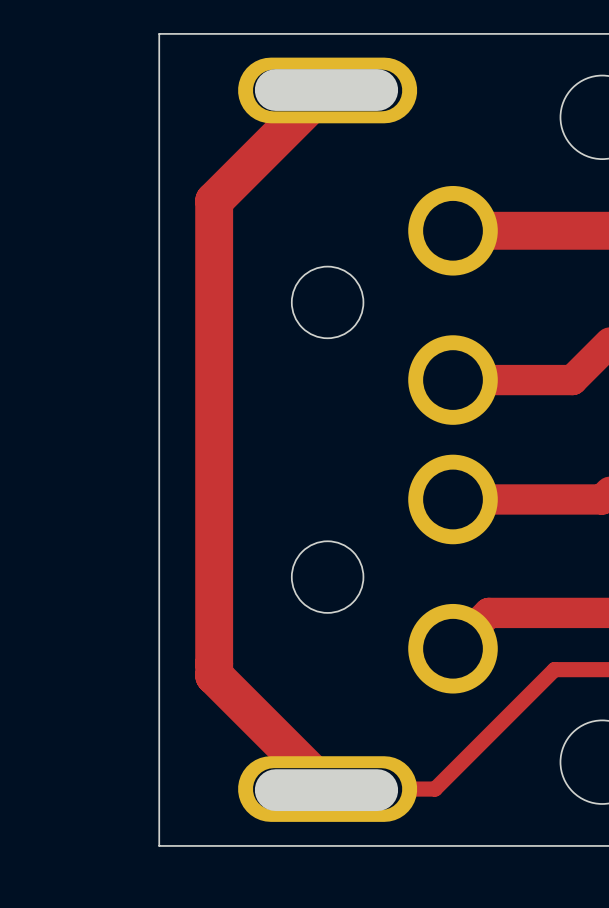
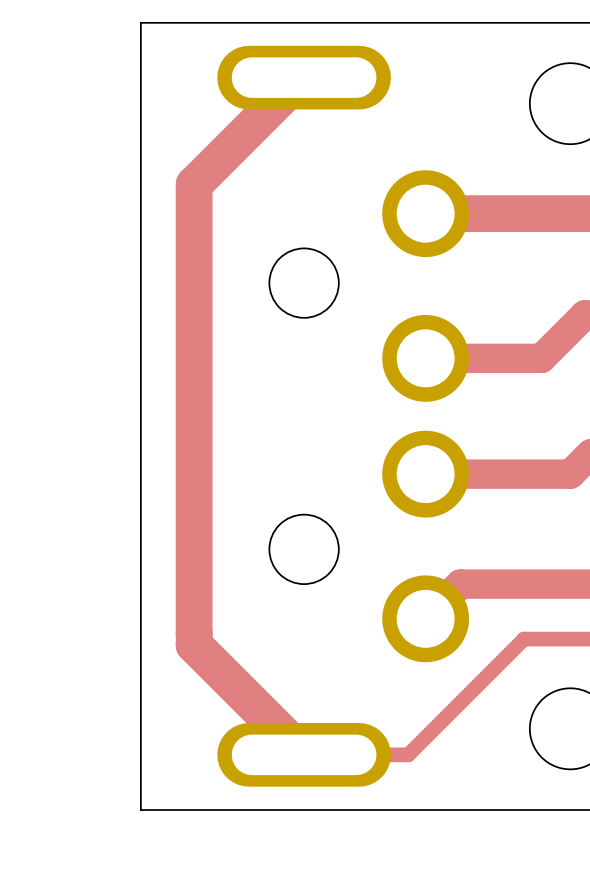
board edge: (275, 90) (377, 90) -> none
board edge: (275, 790) (377, 790) -> none

